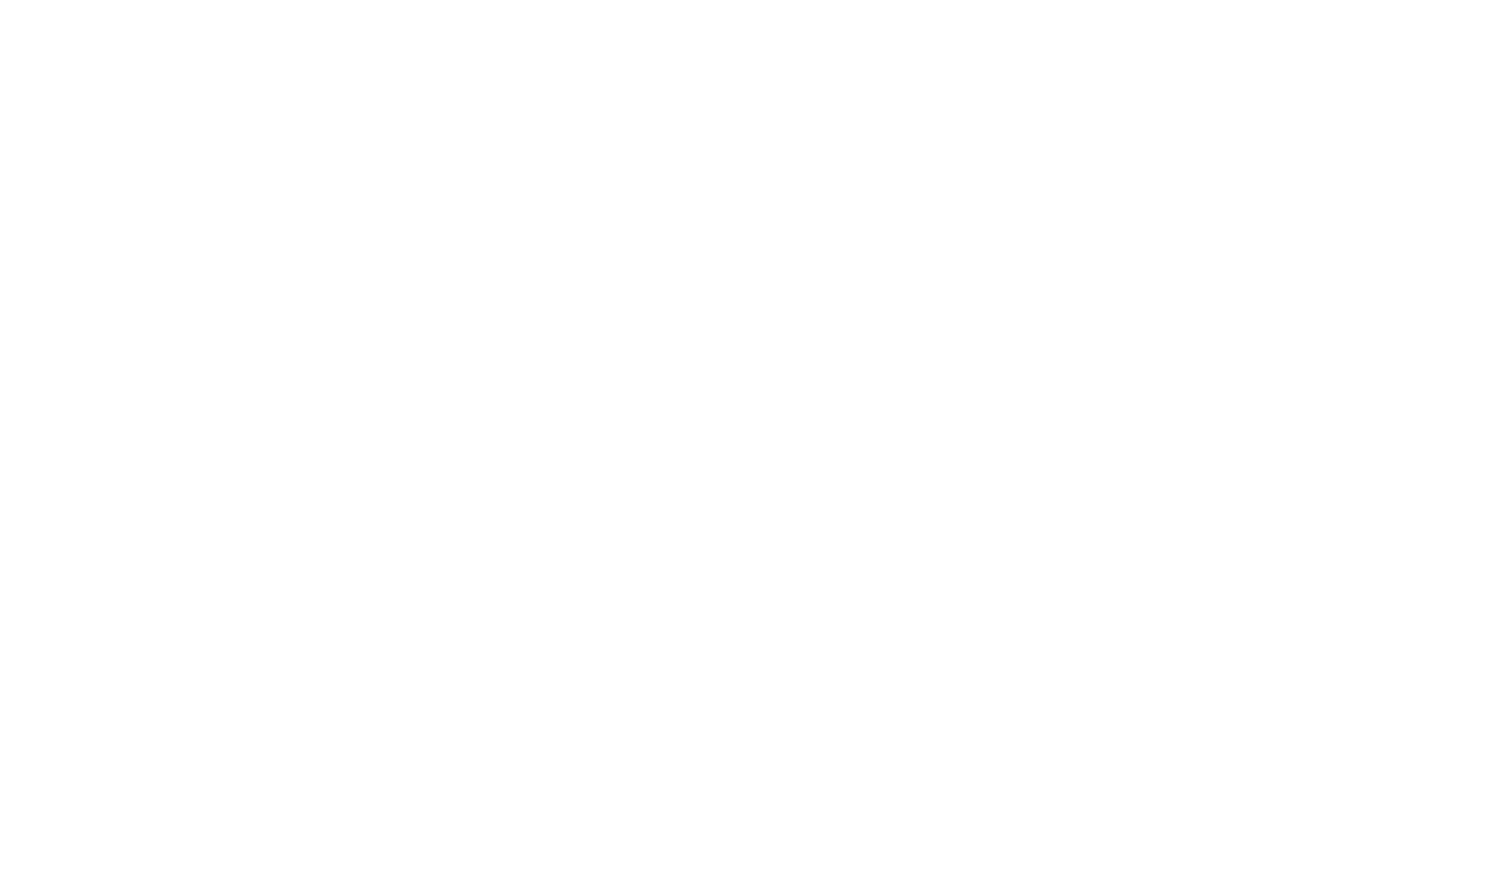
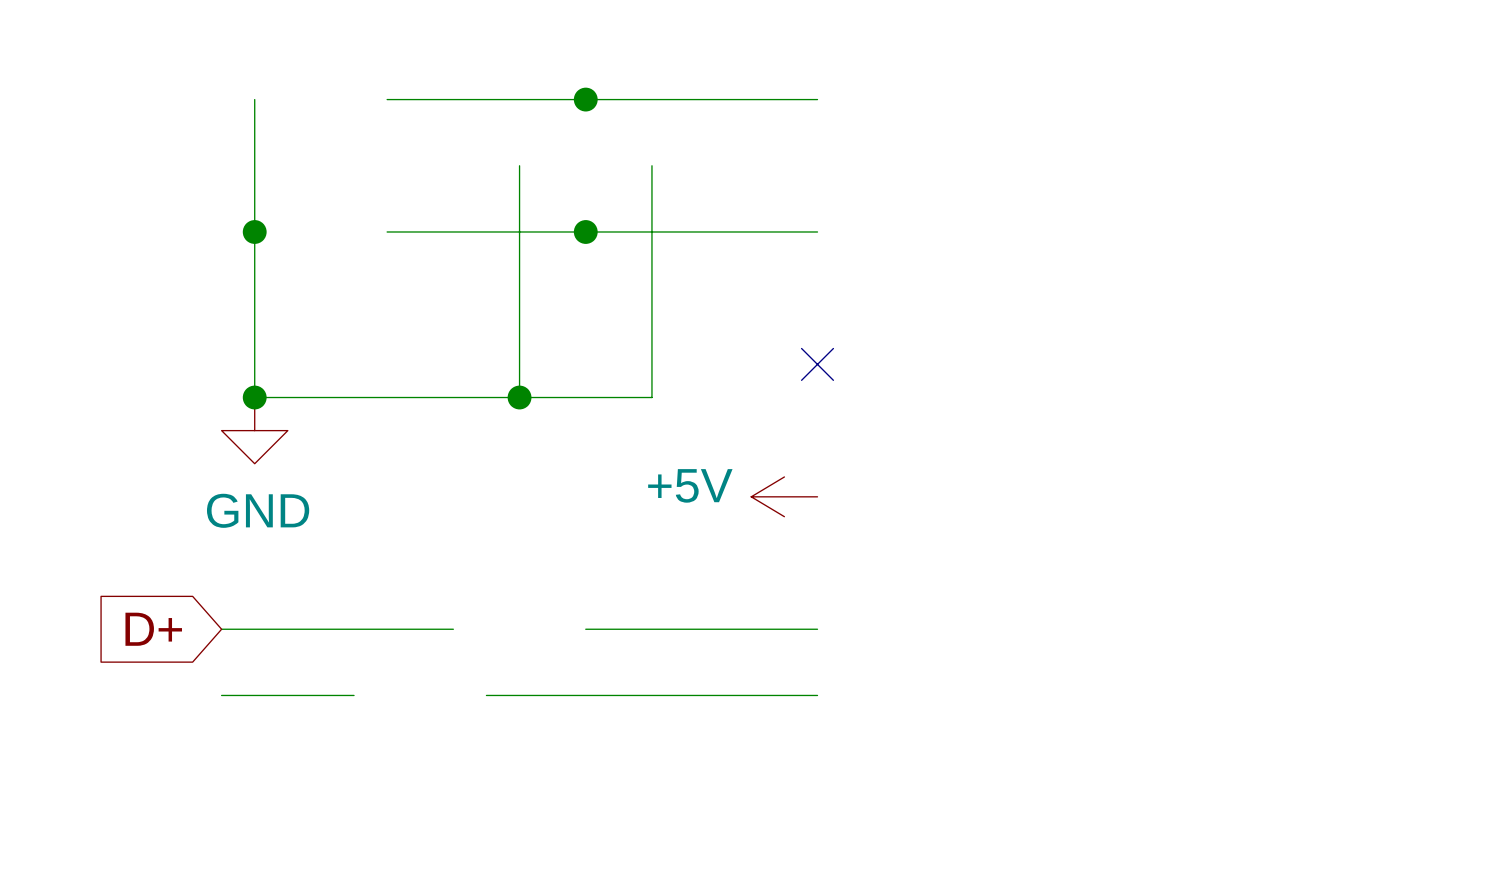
wire: none -> (254, 99) (254, 397) (651, 397) (651, 165)
wire: none -> (387, 99) (817, 99)
junction: none -> (585, 99)
wire: none -> (519, 165) (519, 397)
junction: none -> (254, 231)
wire: none -> (387, 231) (817, 231)
junction: none -> (585, 231)
no-connect mark: none -> (817, 364)
junction: none -> (254, 397)
junction: none -> (519, 397)
power symbol: none -> GND (254, 430)
power symbol: none -> +5V (784, 496)
global label: none -> D+ (153, 629)
wire: none -> (221, 629) (453, 629)
wire: none -> (585, 629) (817, 629)
wire: none -> (221, 695) (354, 695)
wire: none -> (486, 695) (817, 695)

